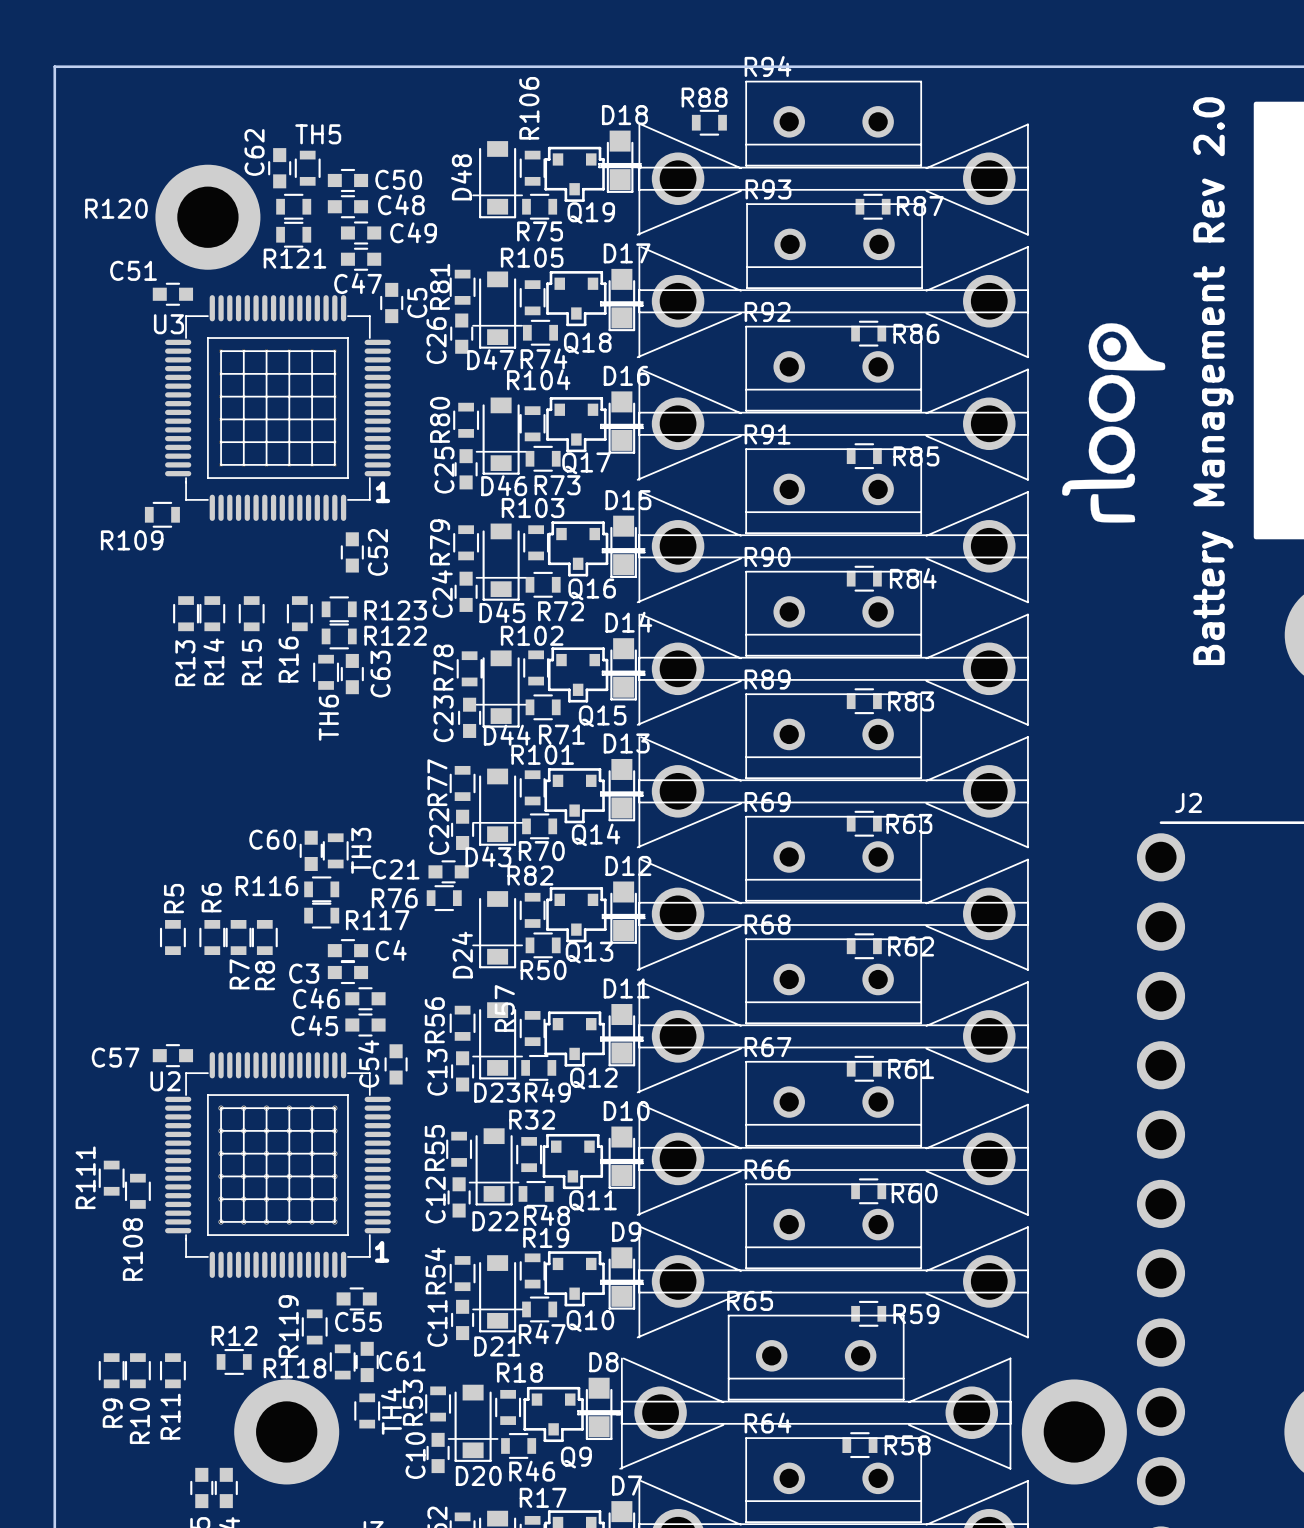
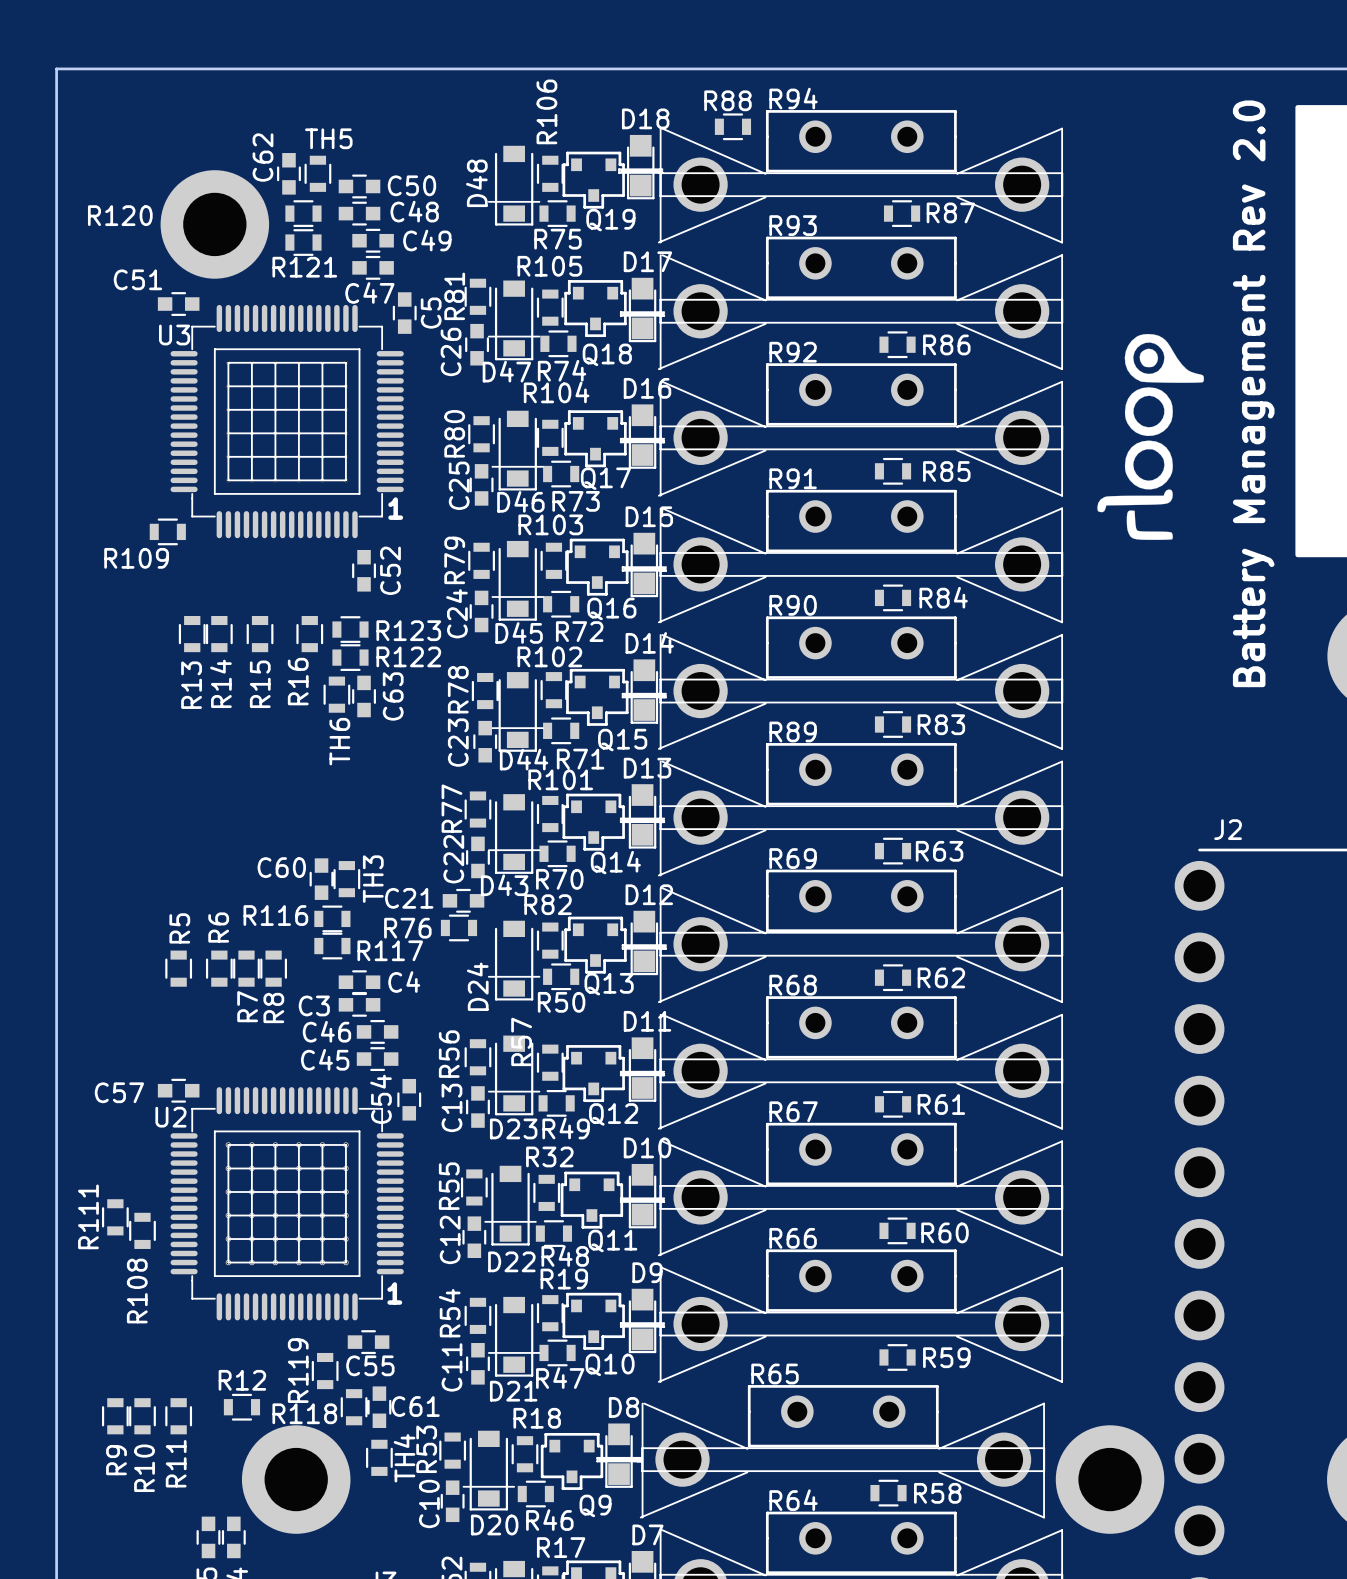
R94 footprint: [745, 80, 923, 167] -> [765, 110, 957, 173]
R93 footprint: [746, 203, 923, 290] -> [765, 236, 957, 300]
R92 footprint: [745, 325, 923, 412] -> [765, 363, 957, 426]
R91 footprint: [745, 448, 923, 535] -> [765, 489, 957, 553]
R90 footprint: [745, 570, 923, 657] -> [765, 616, 957, 679]
R89 footprint: [745, 693, 923, 780] -> [765, 743, 957, 806]
R69 footprint: [745, 815, 923, 902] -> [765, 869, 957, 933]
R68 footprint: [745, 938, 923, 1025] -> [765, 996, 957, 1059]
R67 footprint: [745, 1060, 923, 1147] -> [765, 1122, 957, 1186]
R66 footprint: [745, 1183, 923, 1270] -> [765, 1249, 957, 1312]
R65 footprint: [727, 1314, 905, 1401] -> [747, 1385, 939, 1448]
R64 footprint: [745, 1437, 923, 1523] -> [765, 1511, 957, 1575]

